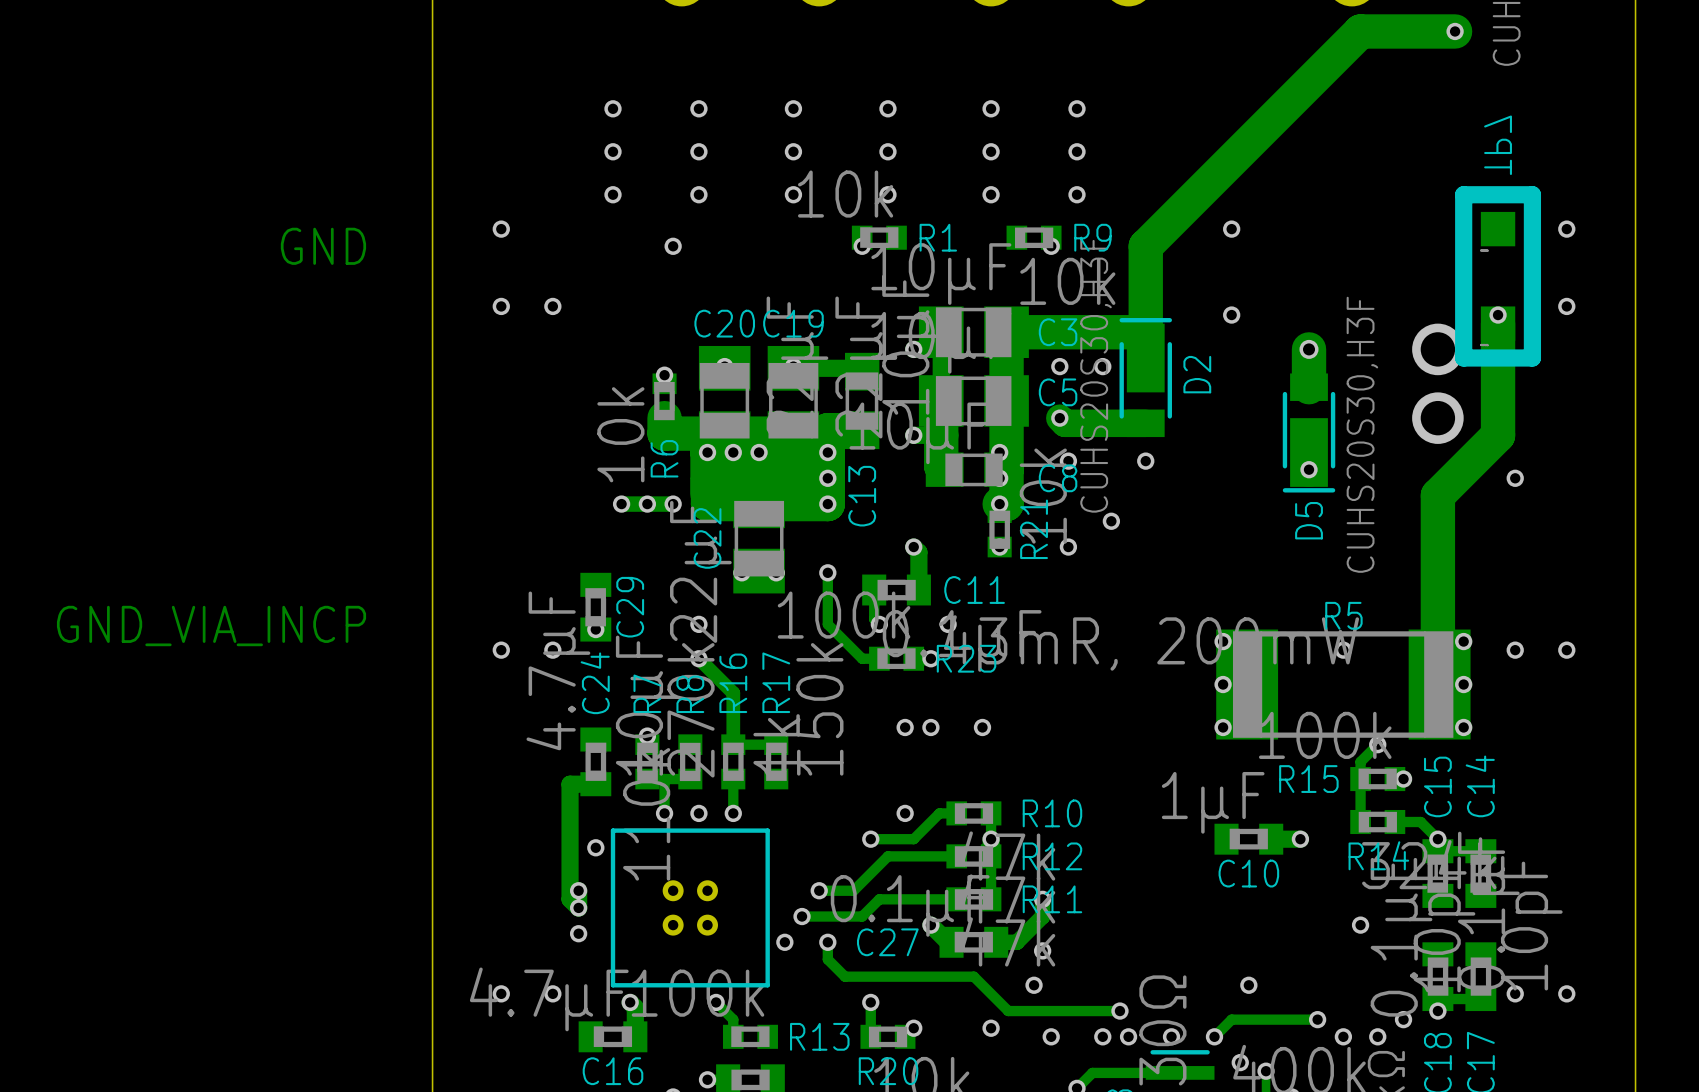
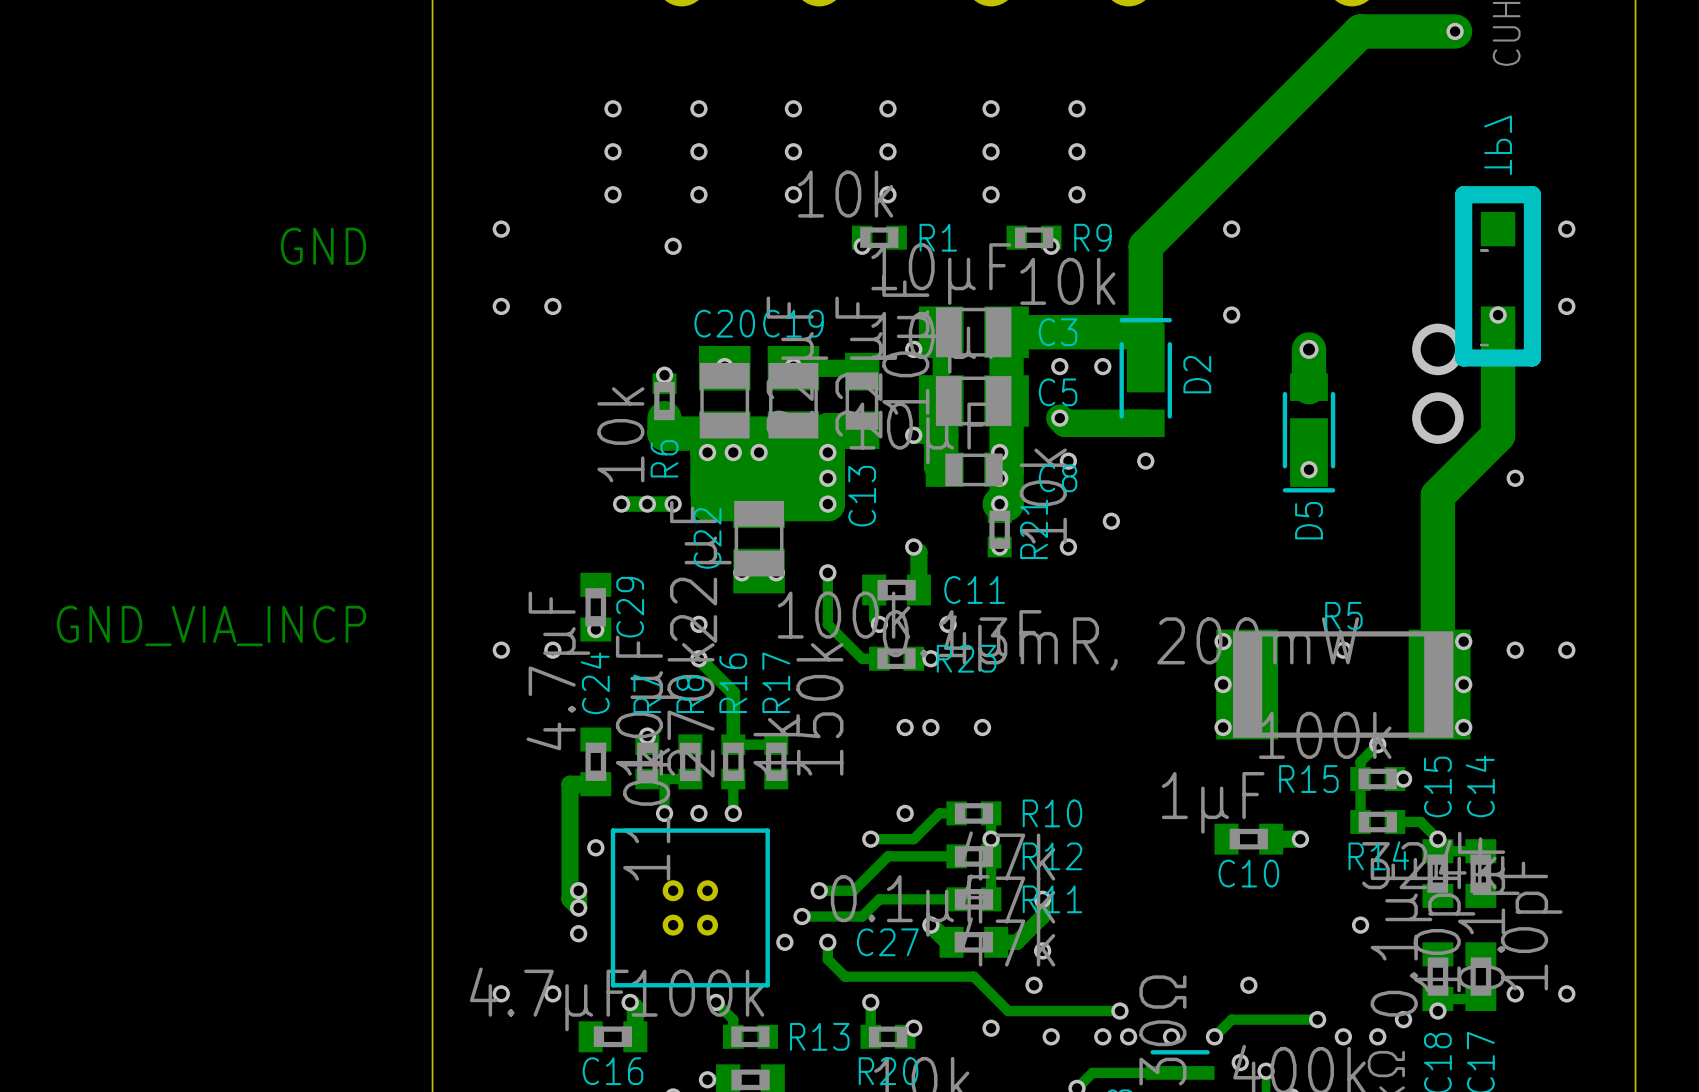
D2 value: CUHS20S30,H3F (1096, 374) -> none
D5 value: CUHS20S30,H3F (1362, 434) -> none

